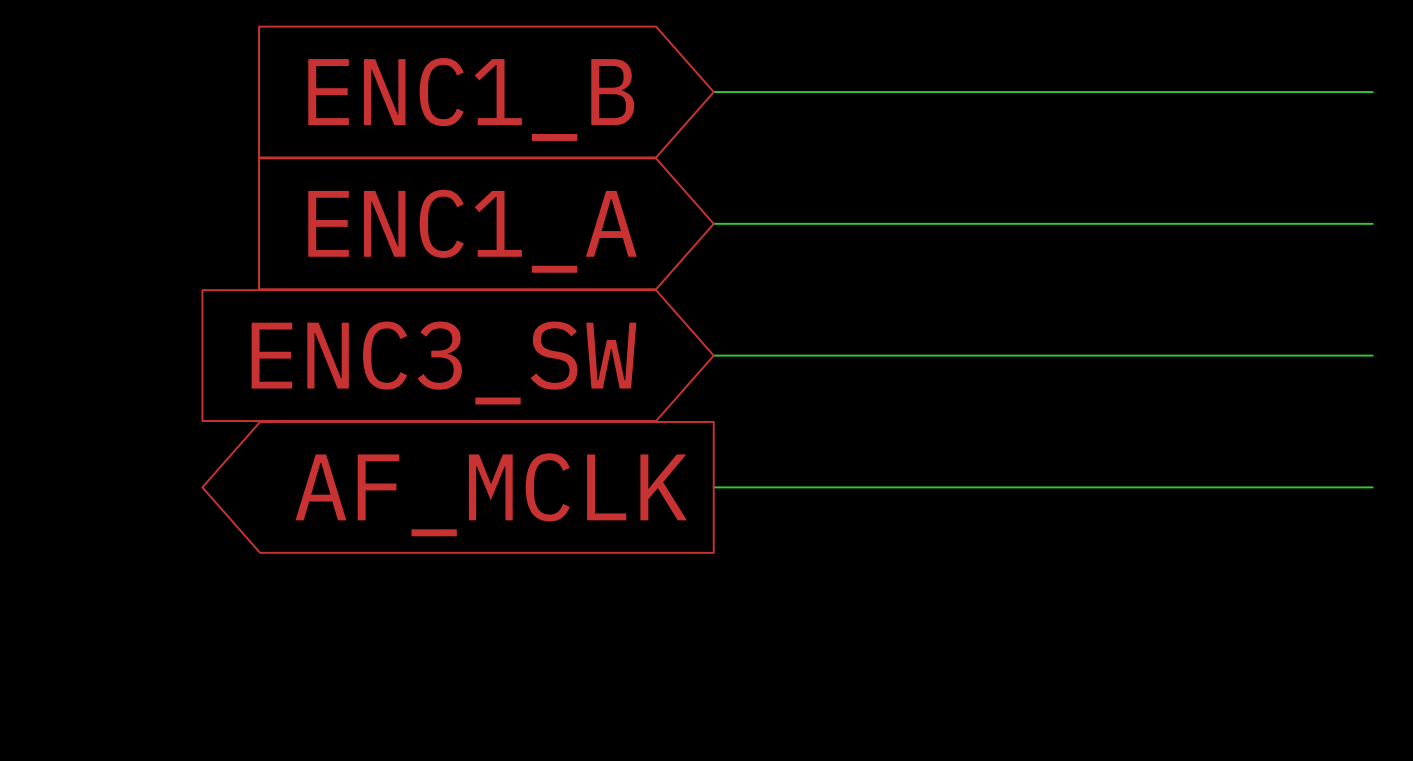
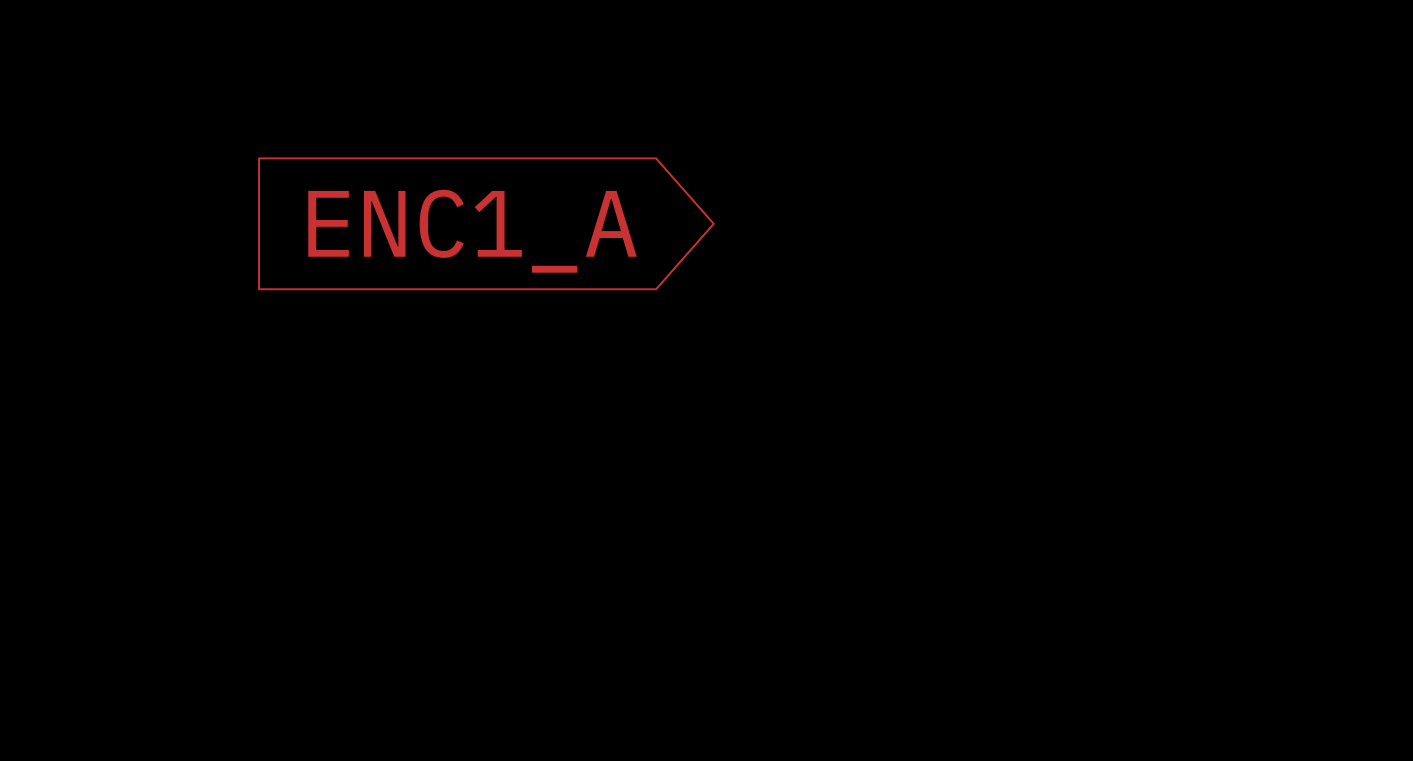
wire: (713, 92) (1372, 92) -> none
global label: ENC1_B (471, 99) -> none
wire: (713, 223) (1372, 223) -> none
wire: (713, 355) (1372, 355) -> none
global label: ENC3_SW (443, 363) -> none
wire: (713, 487) (1372, 487) -> none
global label: AF_MCLK (491, 494) -> none

